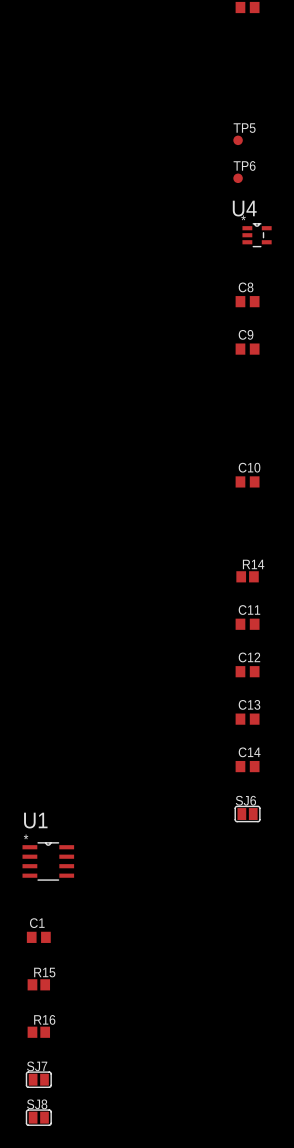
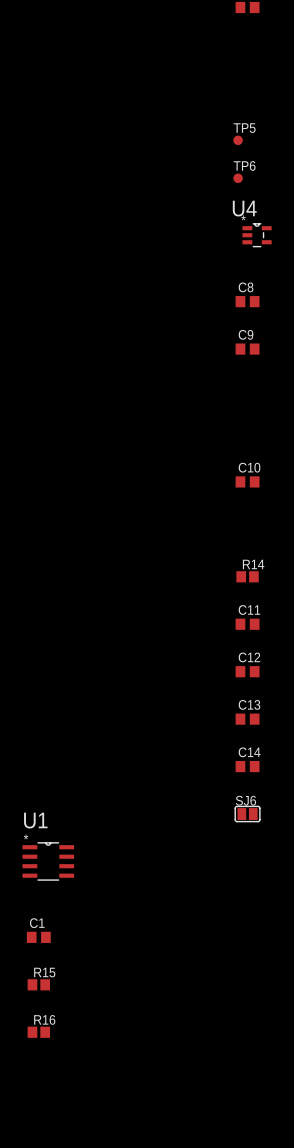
SJ7: (38, 1079) -> none
SJ8: (38, 1117) -> none

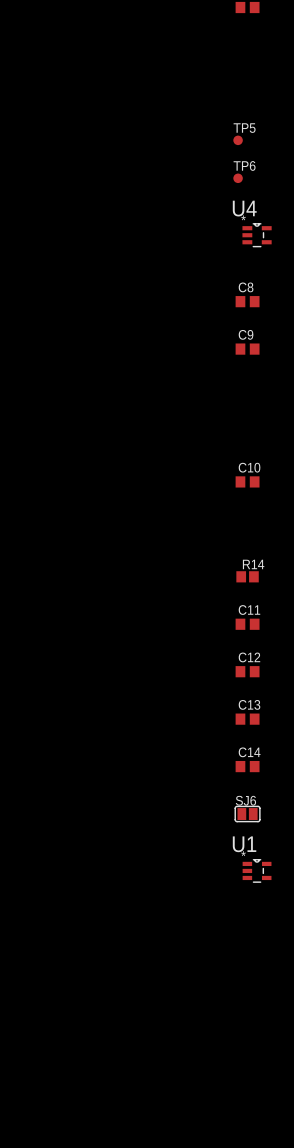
U1 footprint: [22, 842, 75, 881] -> [242, 859, 272, 883]
C1: (38, 937) -> none
R15: (38, 984) -> none
R16: (38, 1032) -> none

